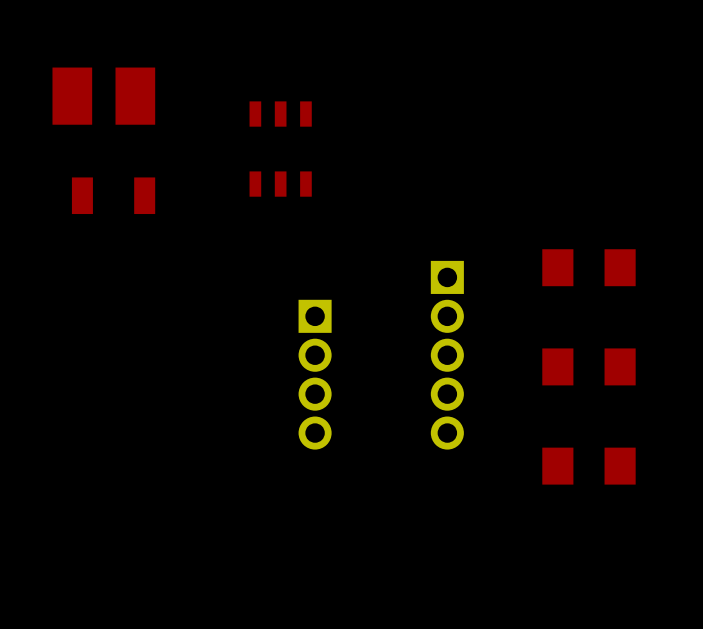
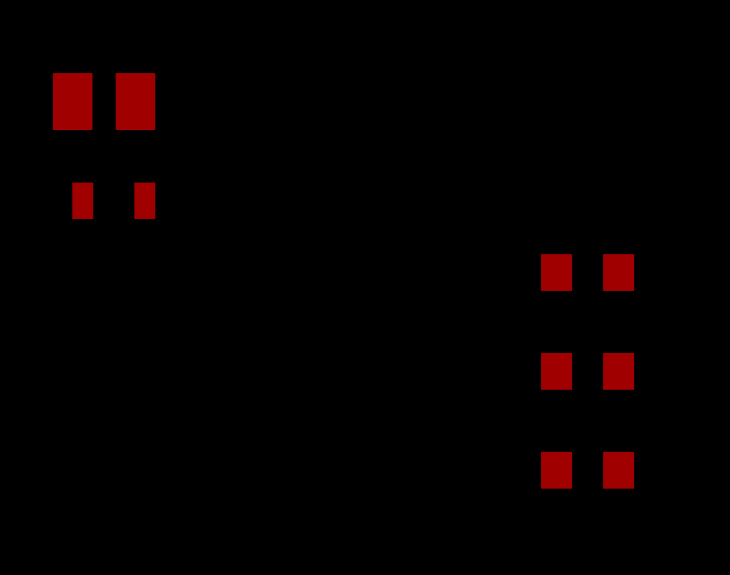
part: (280, 149) -> none
part: (447, 355) -> none
part: (315, 374) -> none

